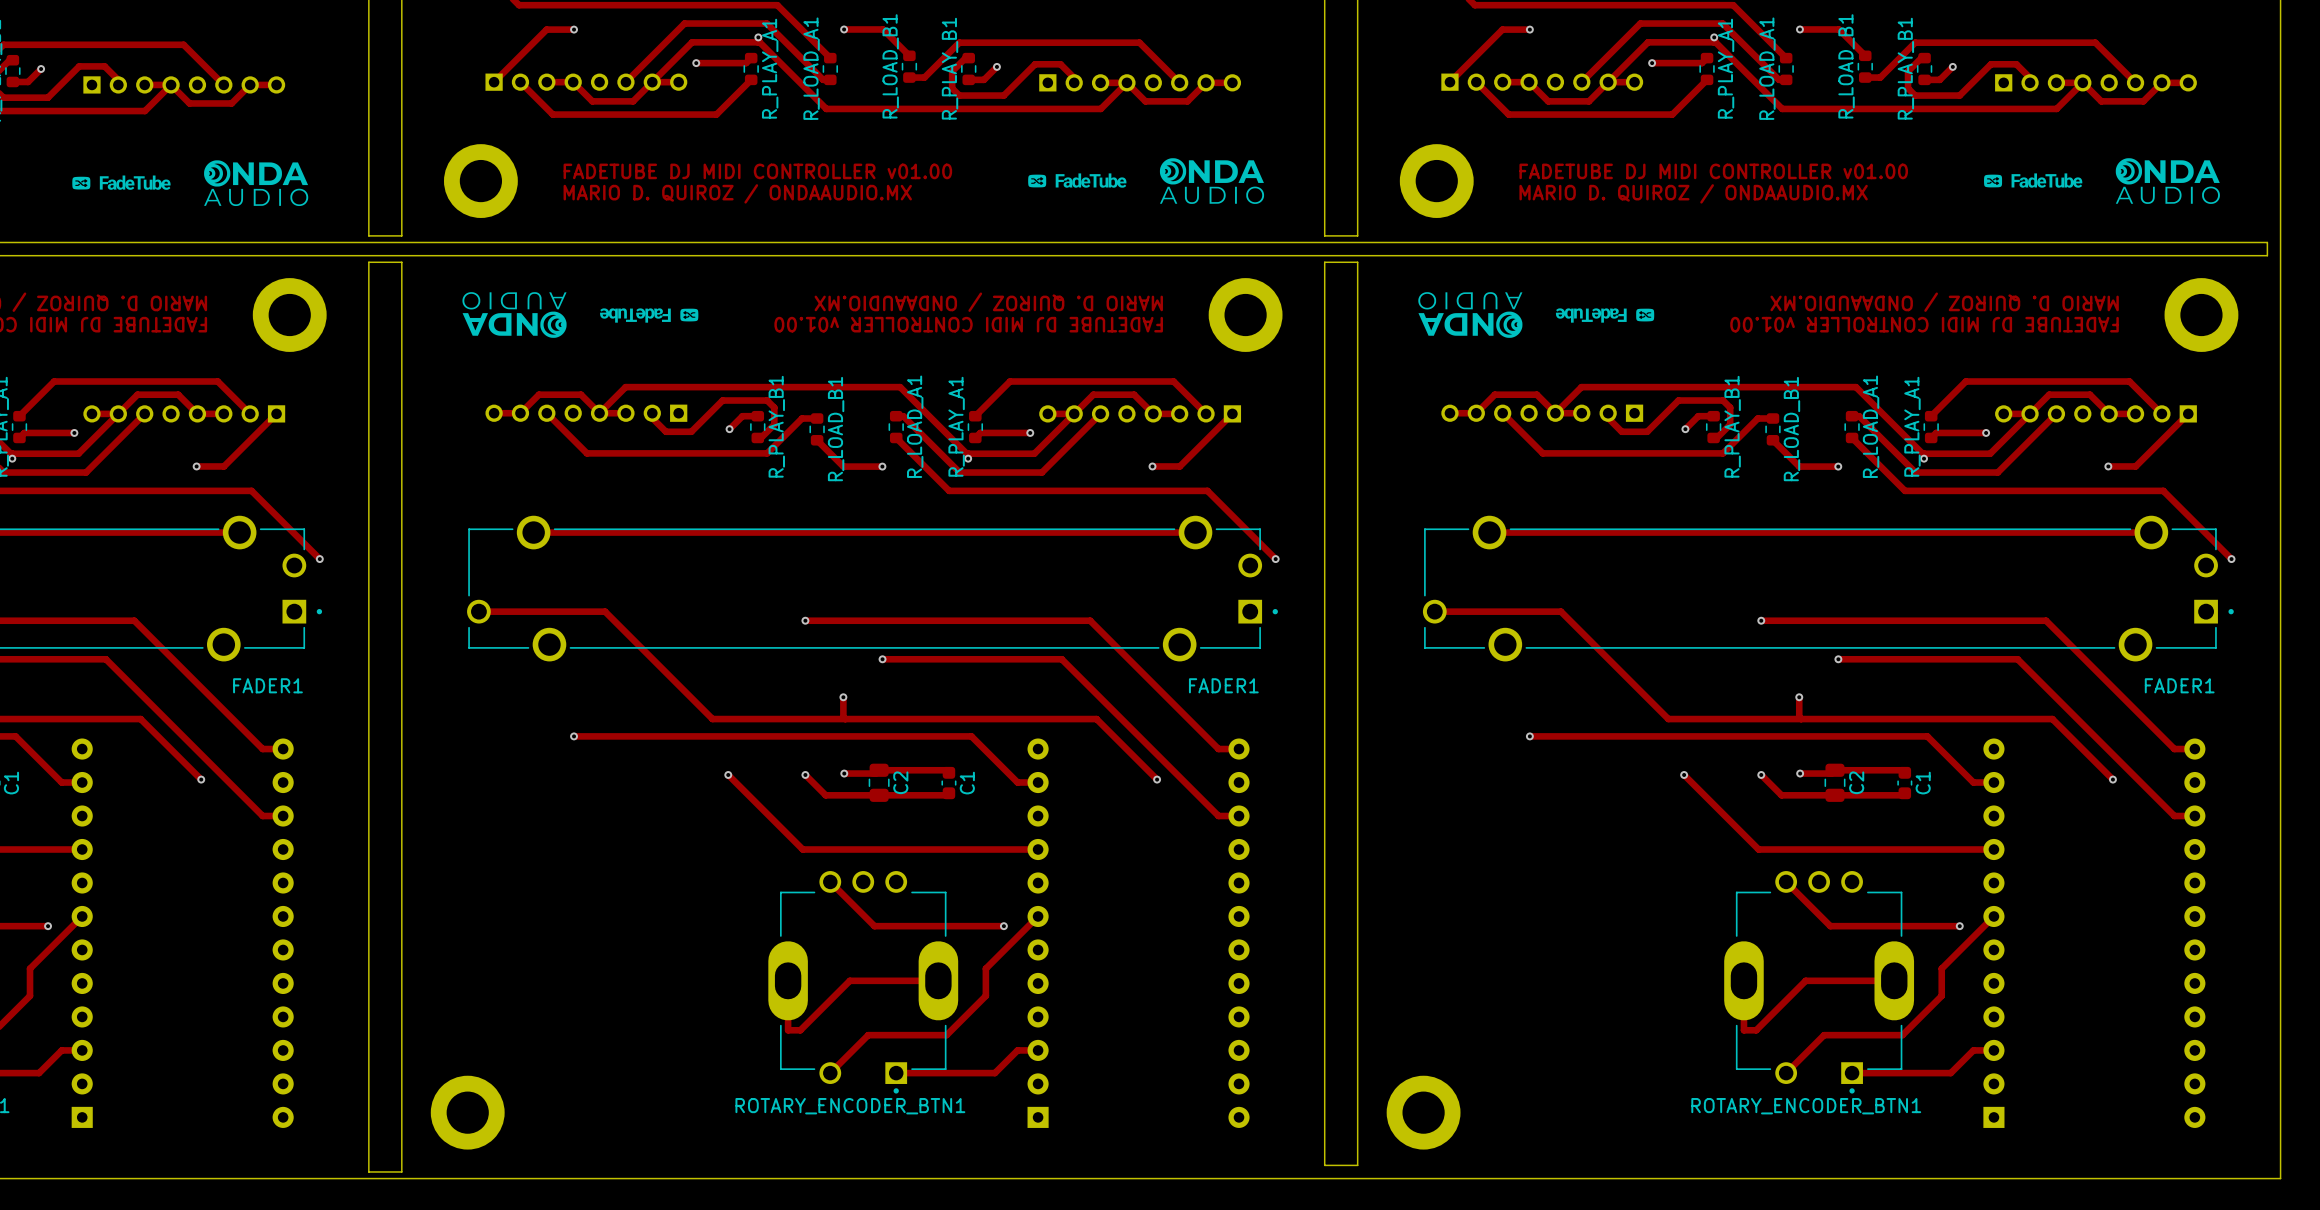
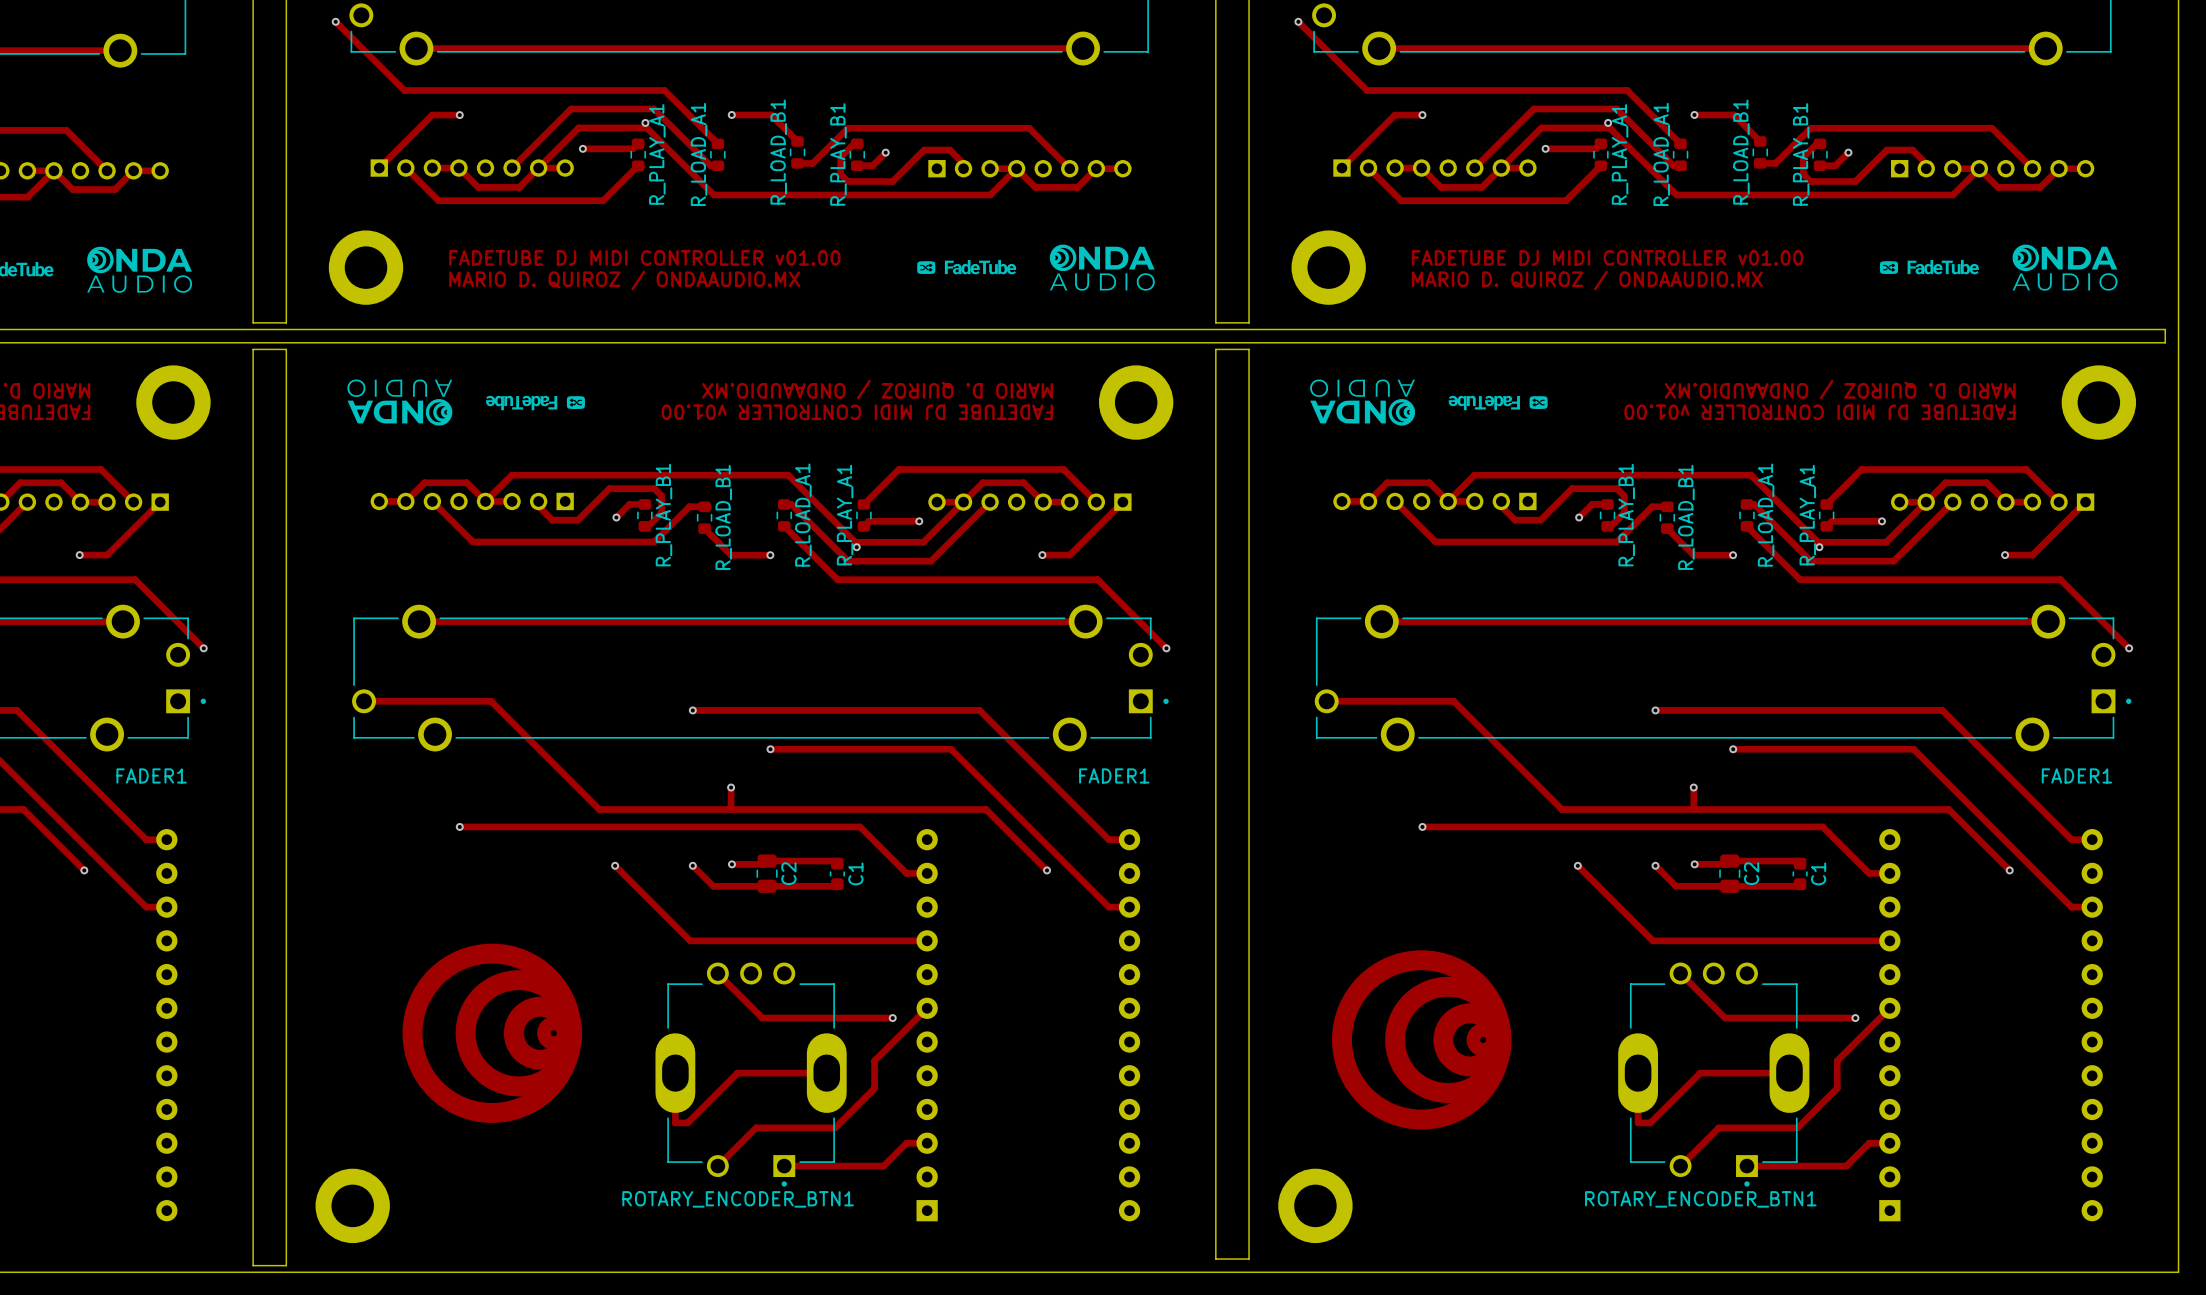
drawing: none -> [402, 943, 582, 1123]
drawing: none -> [1332, 950, 1512, 1130]

